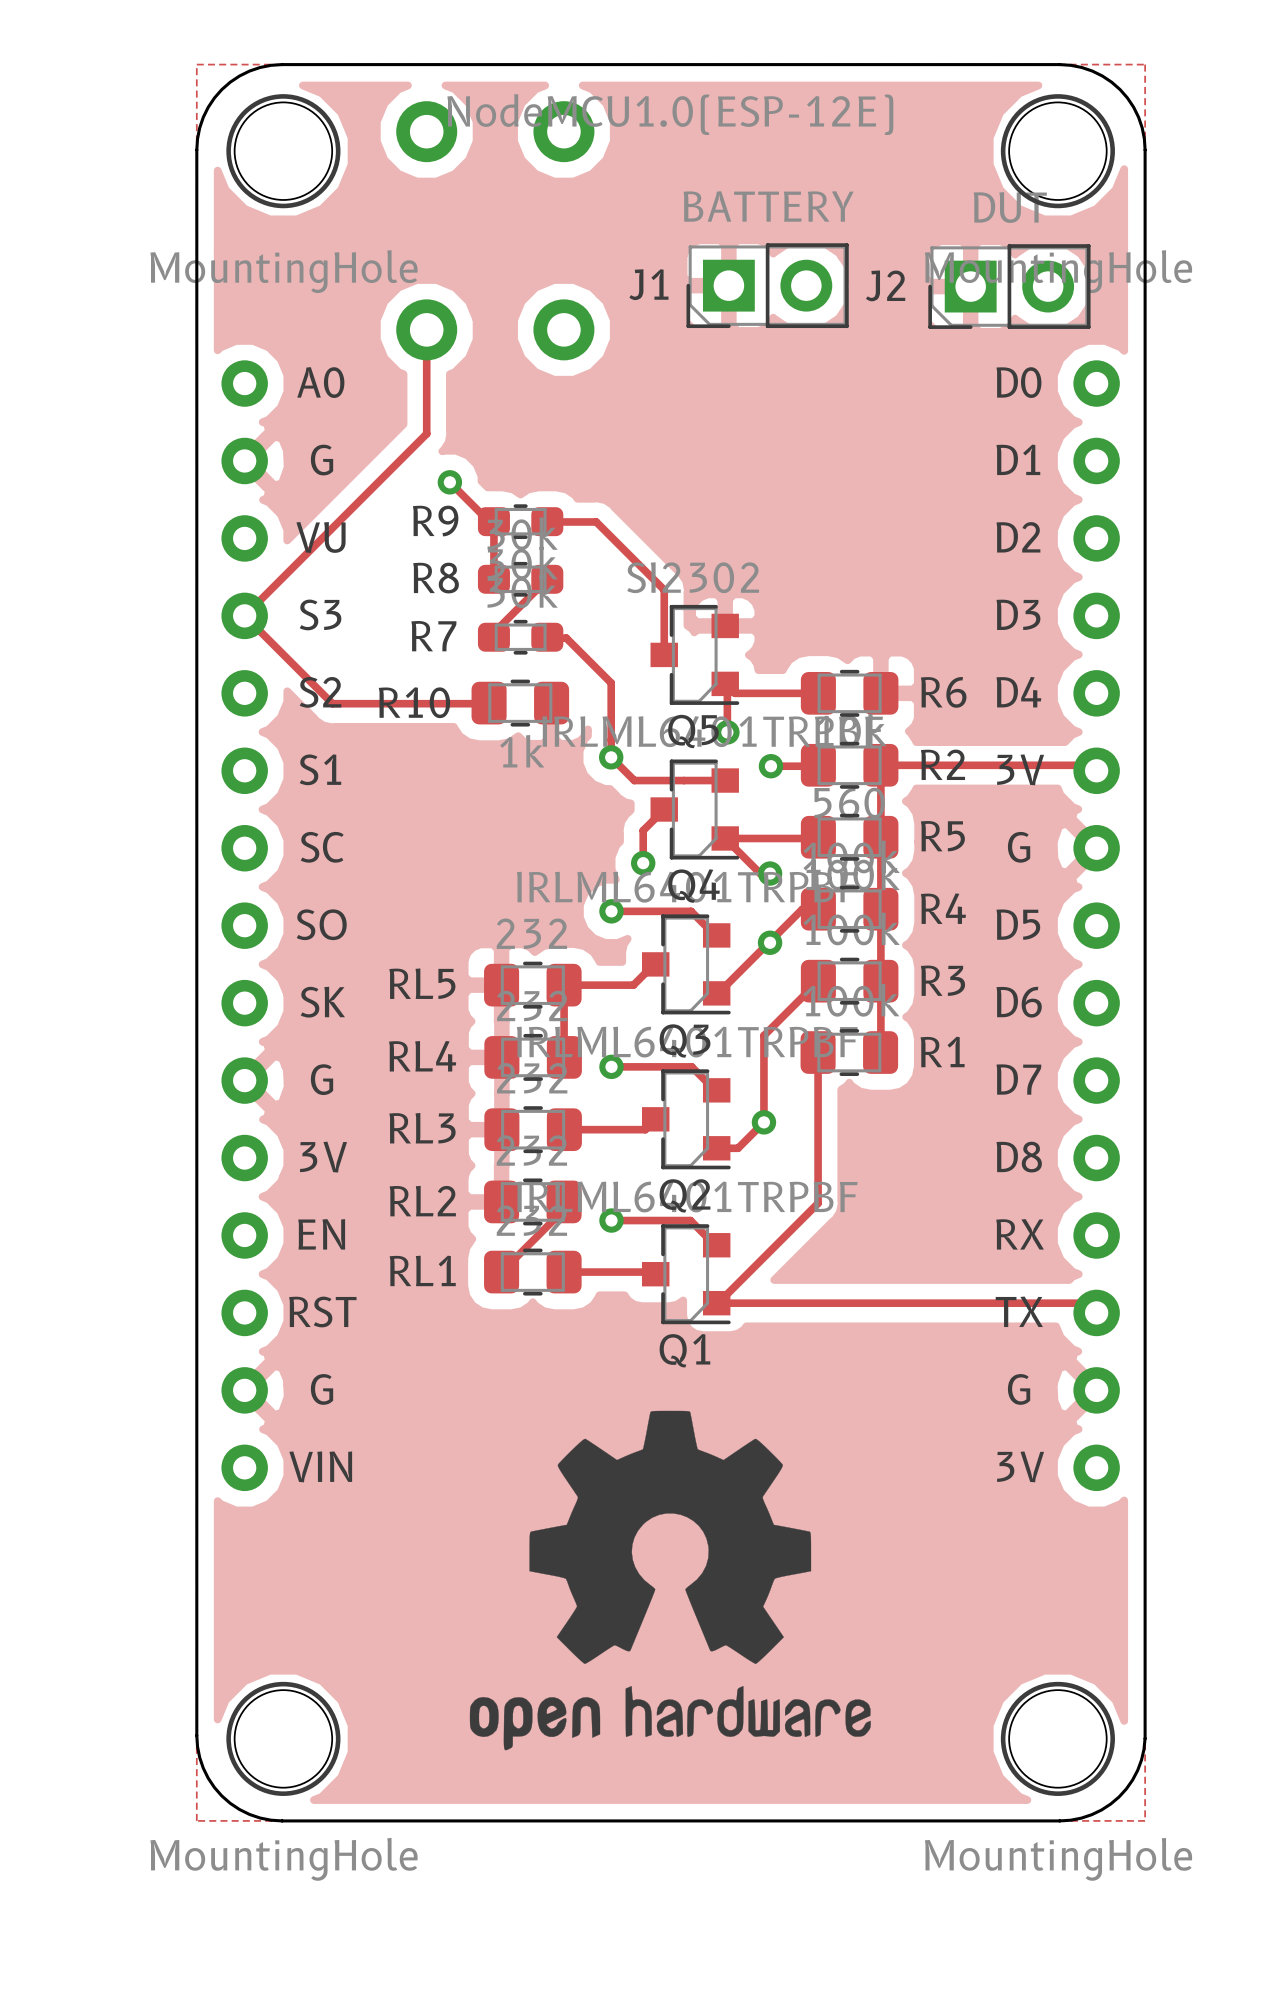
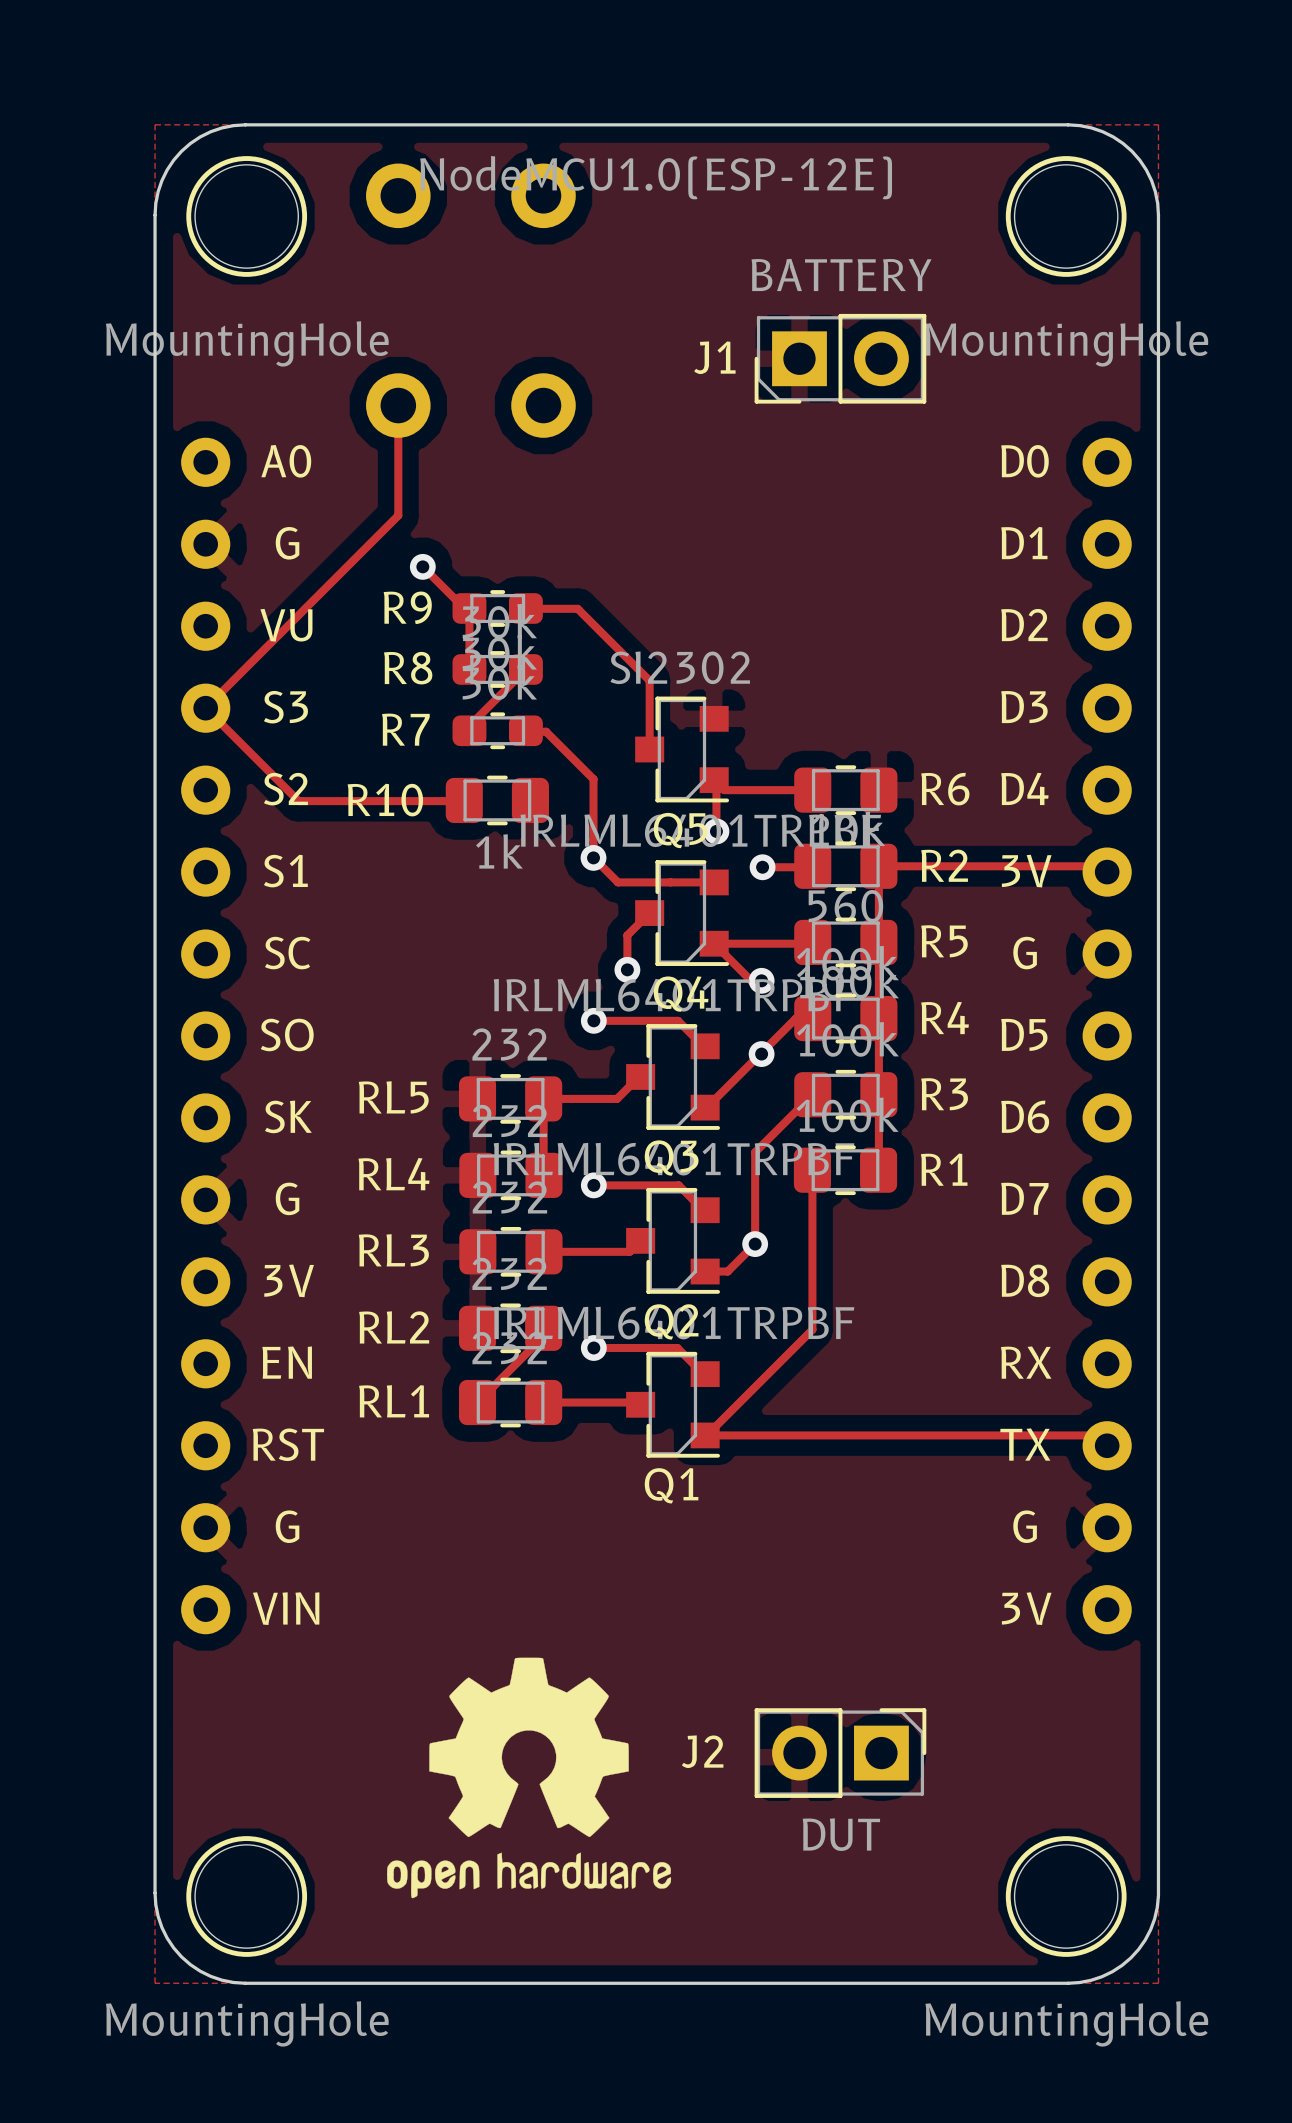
J1 position: (767, 285) -> (840, 358)
J2 rotation: 0° (1009, 286) -> 180° (840, 1753)
J2 position: (1009, 286) -> (840, 1753)
drawing: [469, 1410, 871, 1751] -> none
drawing: none -> [387, 1657, 672, 1899]

